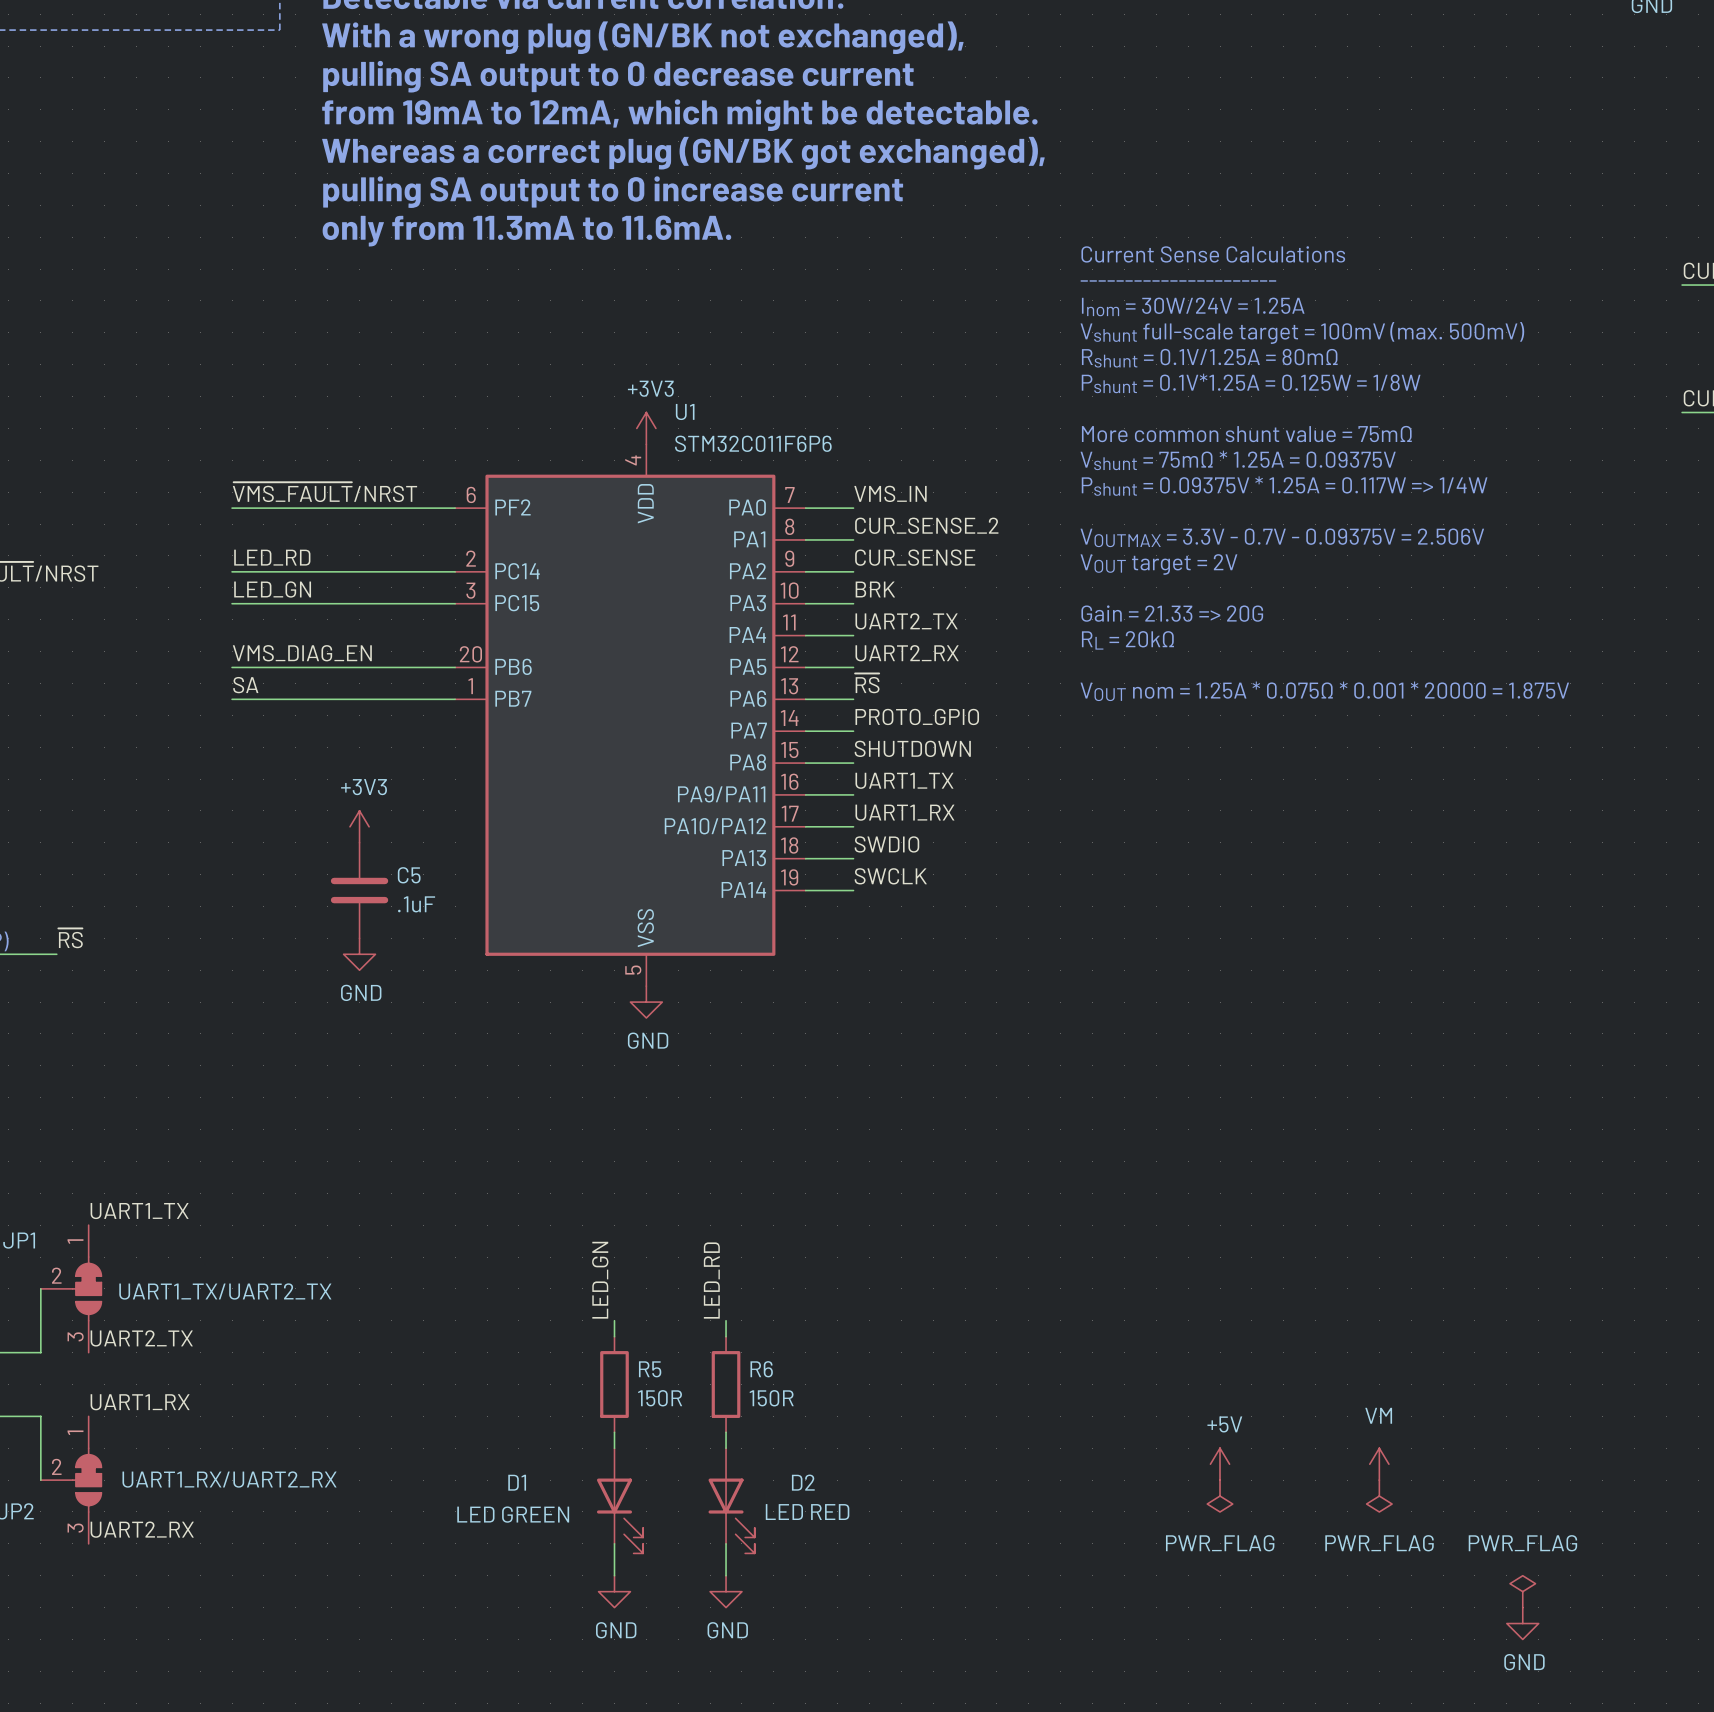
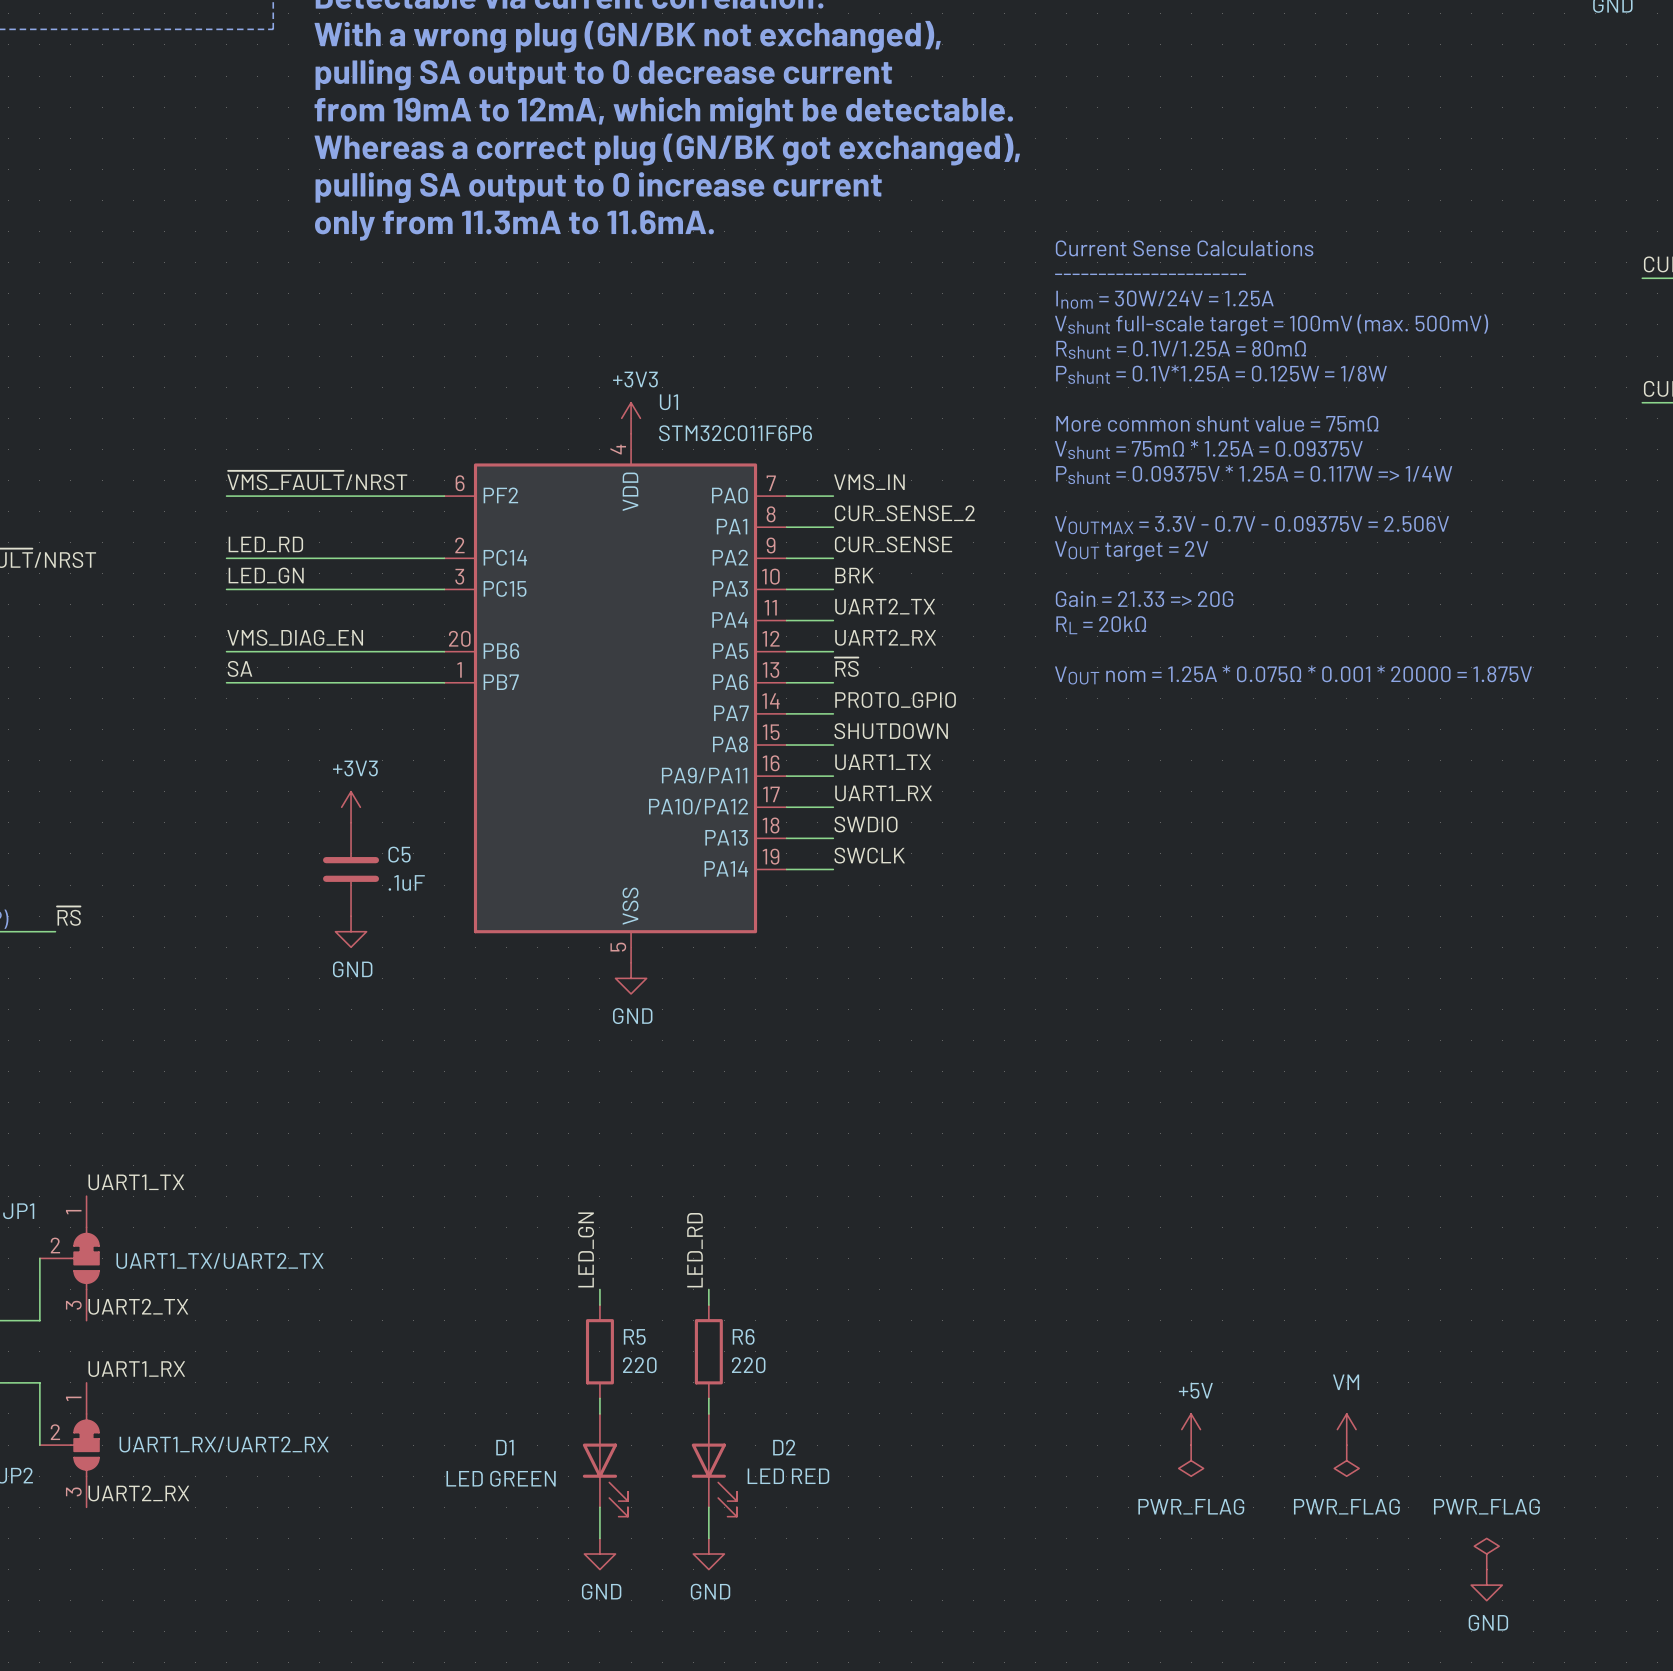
R5 value: 150R (660, 1398) -> 220 (639, 1365)
R6 value: 150R (771, 1398) -> 220 (748, 1365)

